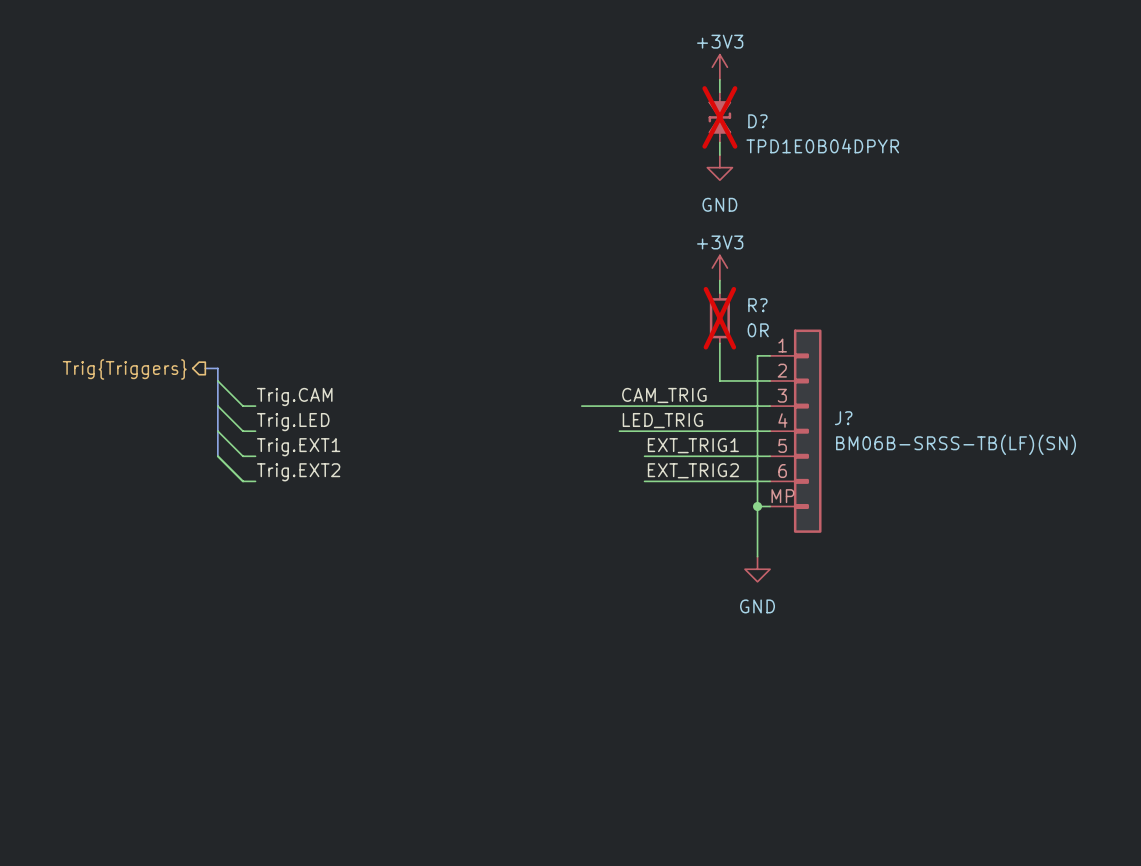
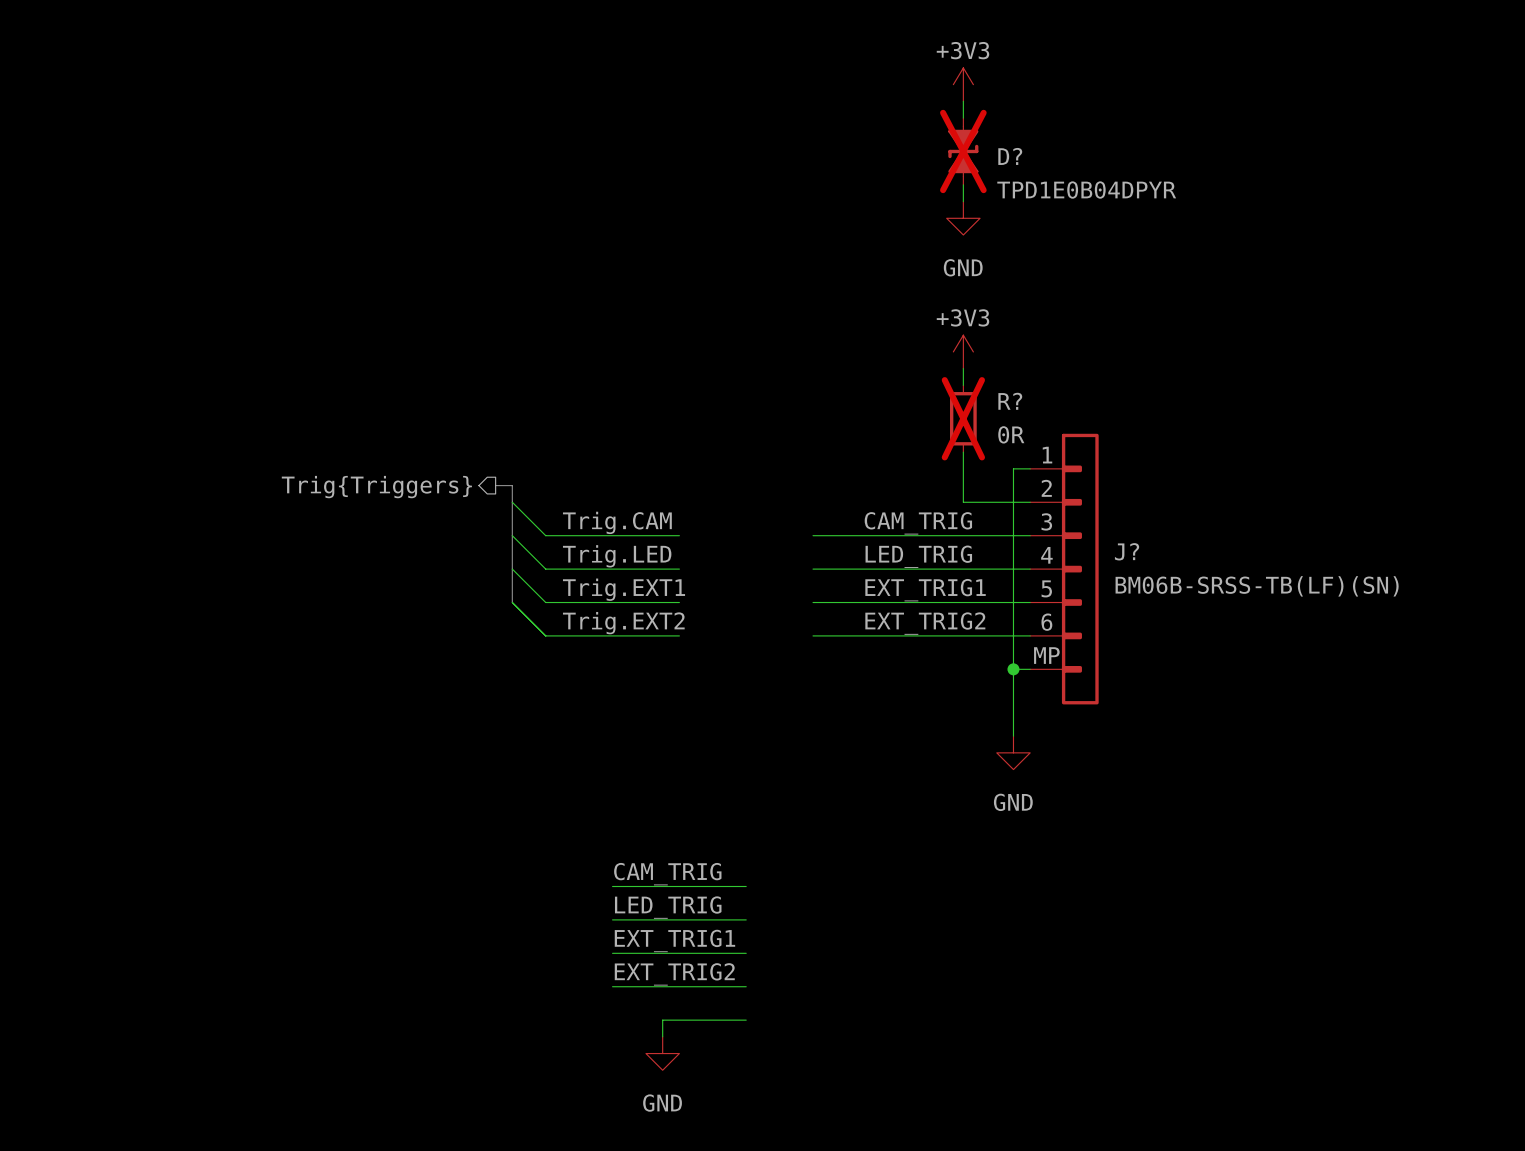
bus: (205, 368) (217, 368) (217, 456) -> (495, 485) (512, 485) (512, 602)
hierarchical label position: Trig{Triggers} (124, 369) -> Trig{Triggers} (376, 487)
wire: (217, 380) (242, 406) (255, 406) -> none
wire: none -> (512, 502) (545, 535) (679, 535)
label position: CAM_TRIG (664, 395) -> CAM_TRIG (918, 523)
label position: Trig.CAM (294, 396) -> Trig.CAM (617, 522)
wire: (217, 406) (242, 431) (255, 431) -> none
wire: none -> (512, 535) (545, 569) (679, 569)
wire: (581, 406) (606, 406) -> none
label position: LED_TRIG (662, 420) -> LED_TRIG (918, 556)
label position: Trig.LED (293, 422) -> Trig.LED (617, 556)
wire: (217, 431) (242, 456) (255, 456) -> none
wire: none -> (512, 569) (545, 602) (679, 602)
wire: none -> (813, 569) (829, 569)
label position: Trig.EXT1 (298, 447) -> Trig.EXT1 (624, 589)
wire: (217, 456) (242, 481) (255, 481) -> none
wire: none -> (512, 602) (545, 635) (679, 635)
wire: none -> (813, 602) (863, 602)
label position: Trig.EXT2 (298, 472) -> Trig.EXT2 (623, 623)
wire: none -> (813, 635) (863, 635)
label: none -> CAM_TRIG (667, 874)
wire: none -> (612, 886) (746, 886)
label: none -> LED_TRIG (668, 907)
wire: none -> (612, 919) (746, 919)
label: none -> EXT_TRIG1 (674, 940)
wire: none -> (612, 953) (746, 953)
label: none -> EXT_TRIG2 (674, 974)
wire: none -> (612, 986) (746, 986)
wire: none -> (746, 1020) (662, 1020) (662, 1036)
power symbol: none -> GND (662, 1053)

